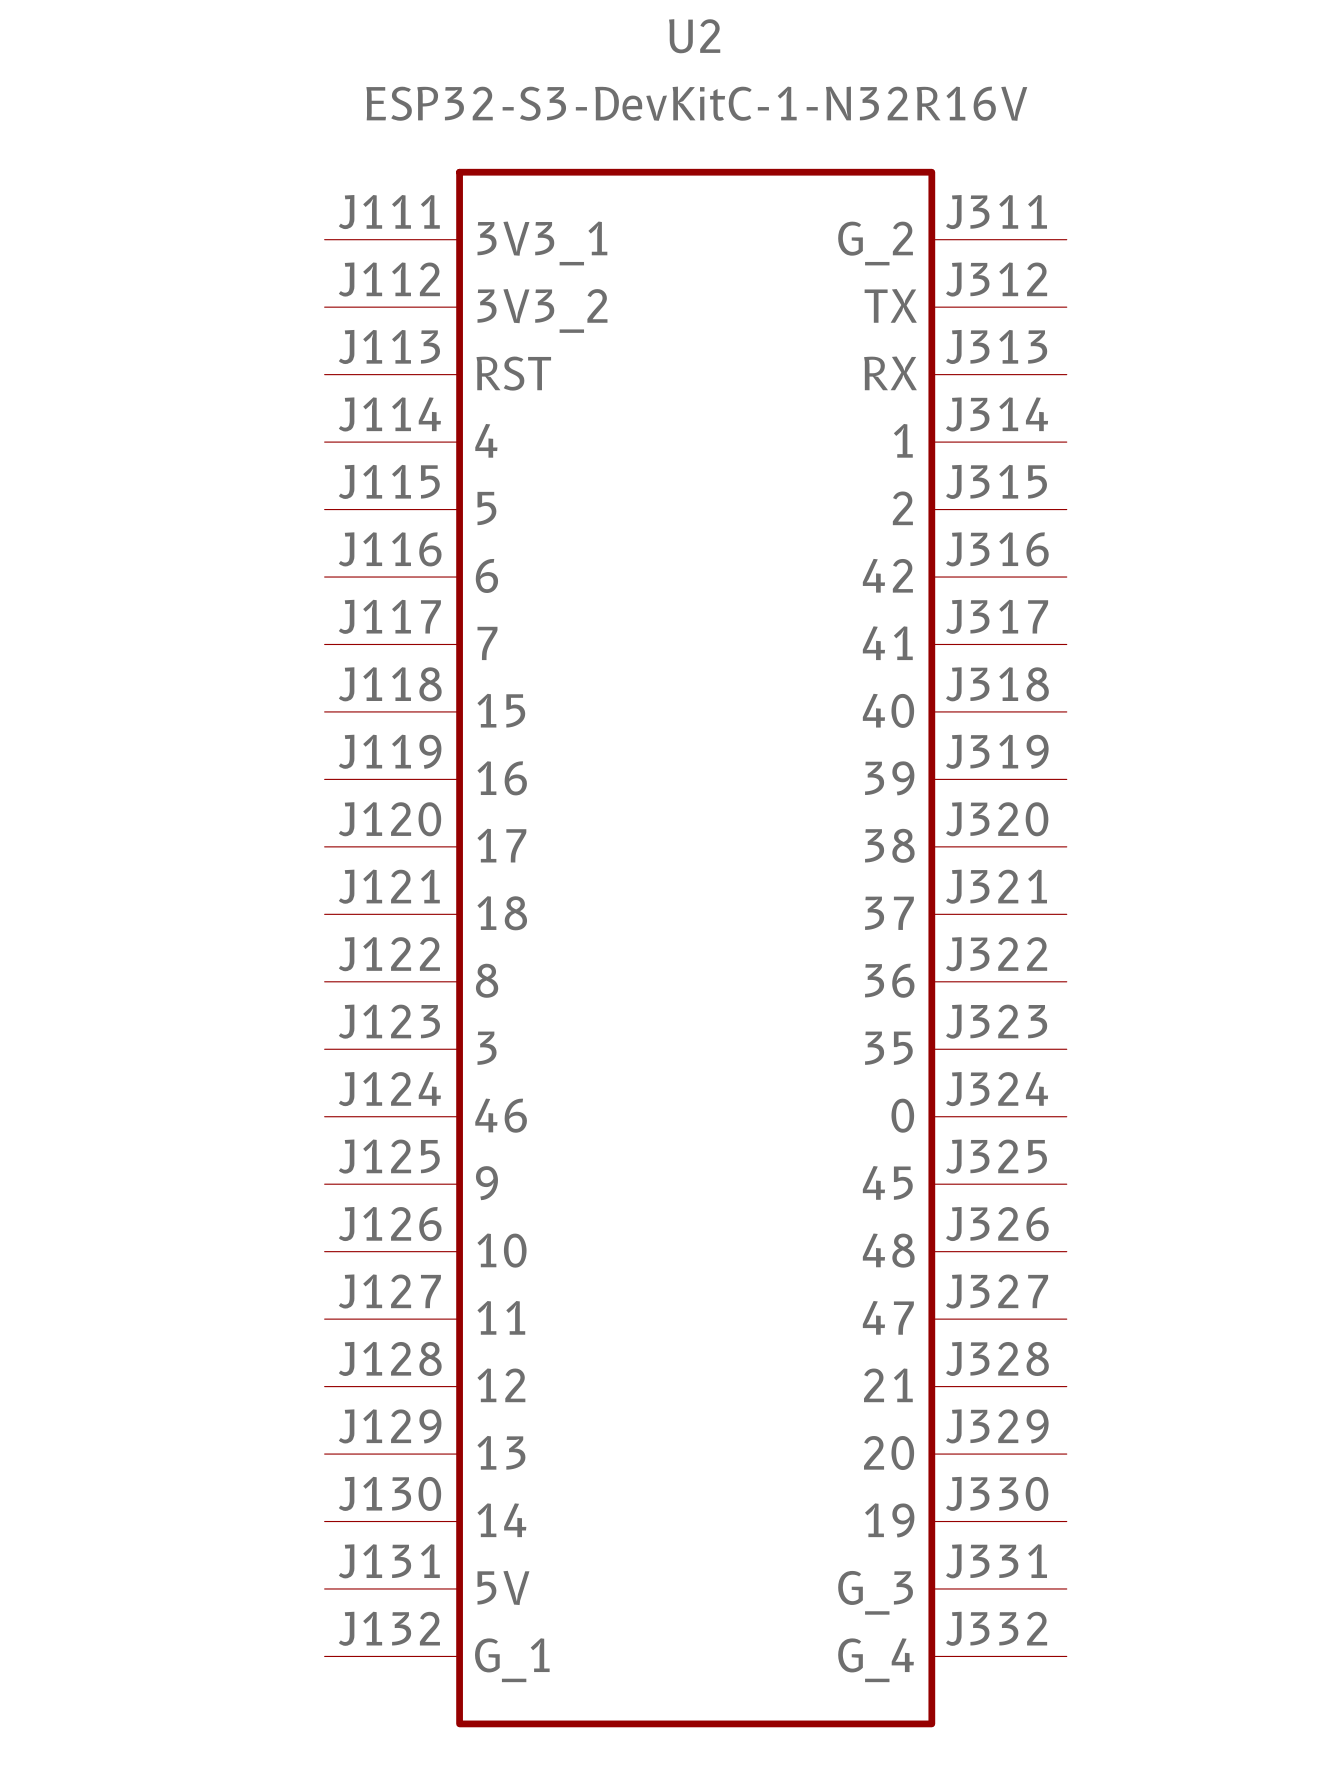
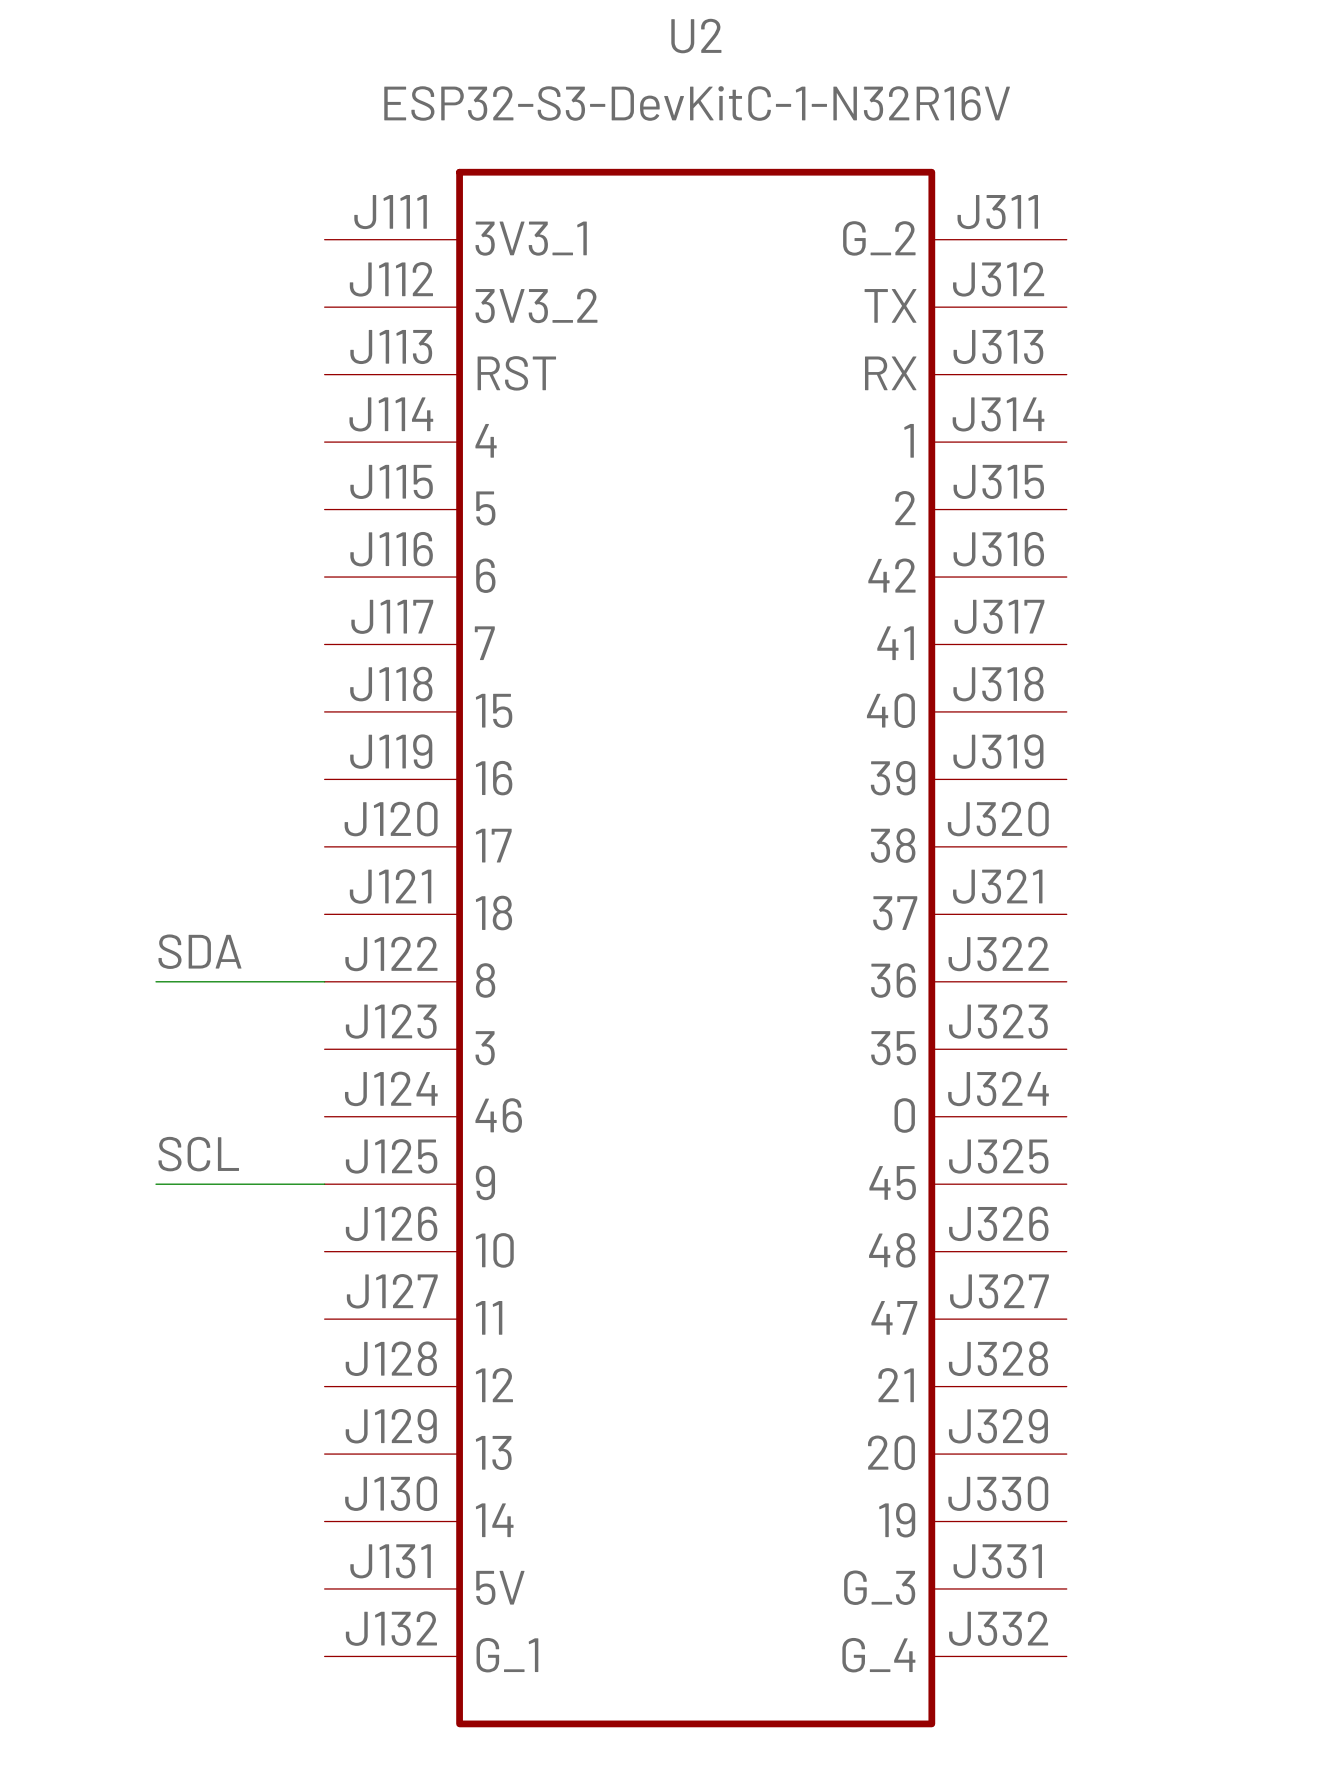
label: none -> SDA (199, 951)
wire: none -> (155, 981) (324, 981)
label: none -> SCL (198, 1154)
wire: none -> (155, 1184) (324, 1184)

